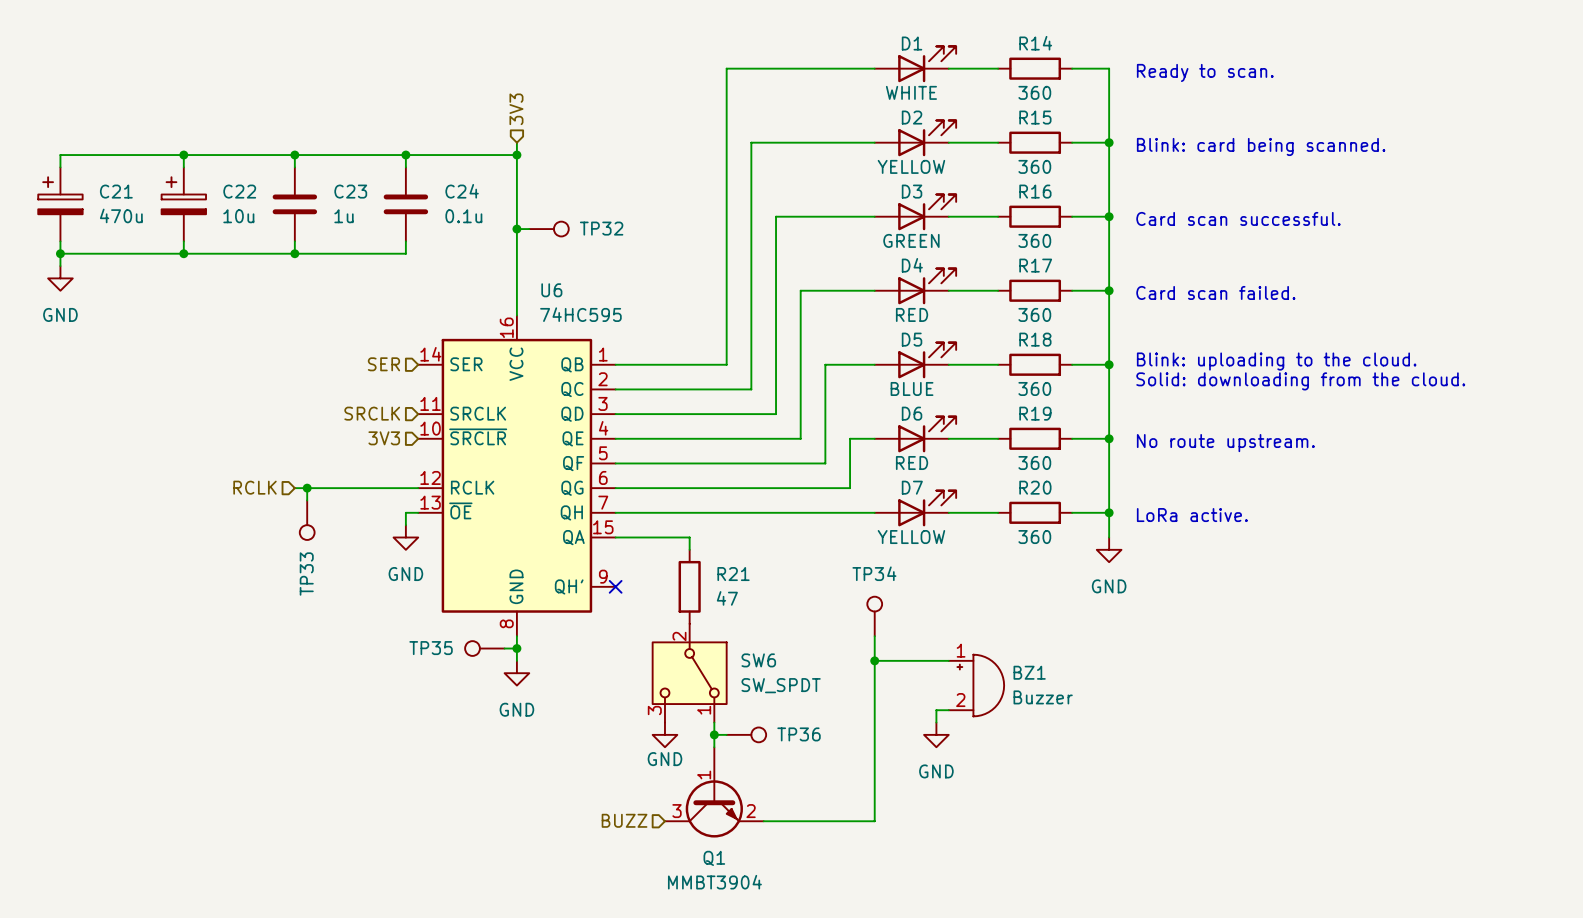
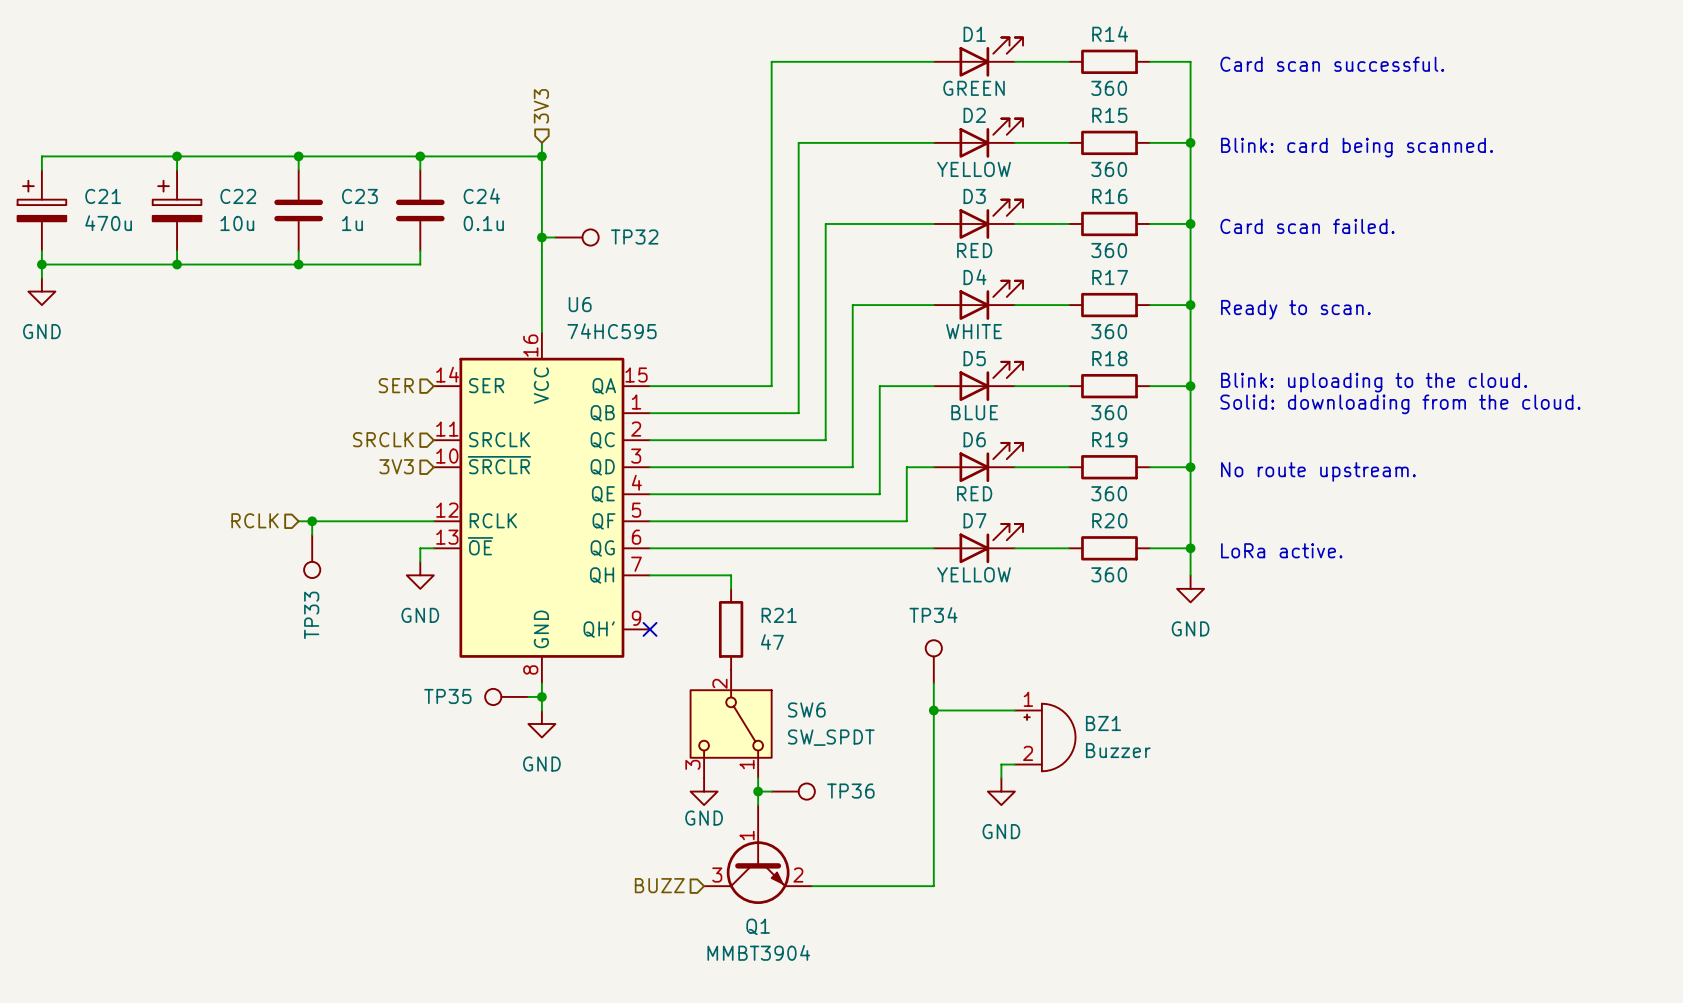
text: Ready to scan. (1205, 72) -> Card scan successful. (1332, 64)
D1 value: WHITE (911, 92) -> GREEN (974, 88)
text: Card scan successful. (1238, 218) -> Card scan failed. (1307, 226)
D3 value: GREEN (911, 240) -> RED (974, 250)
text: Card scan failed. (1215, 292) -> Ready to scan. (1295, 309)
D4 value: RED (912, 314) -> WHITE (974, 331)
U6 symbol: [418, 315, 616, 637] -> [433, 332, 651, 684]

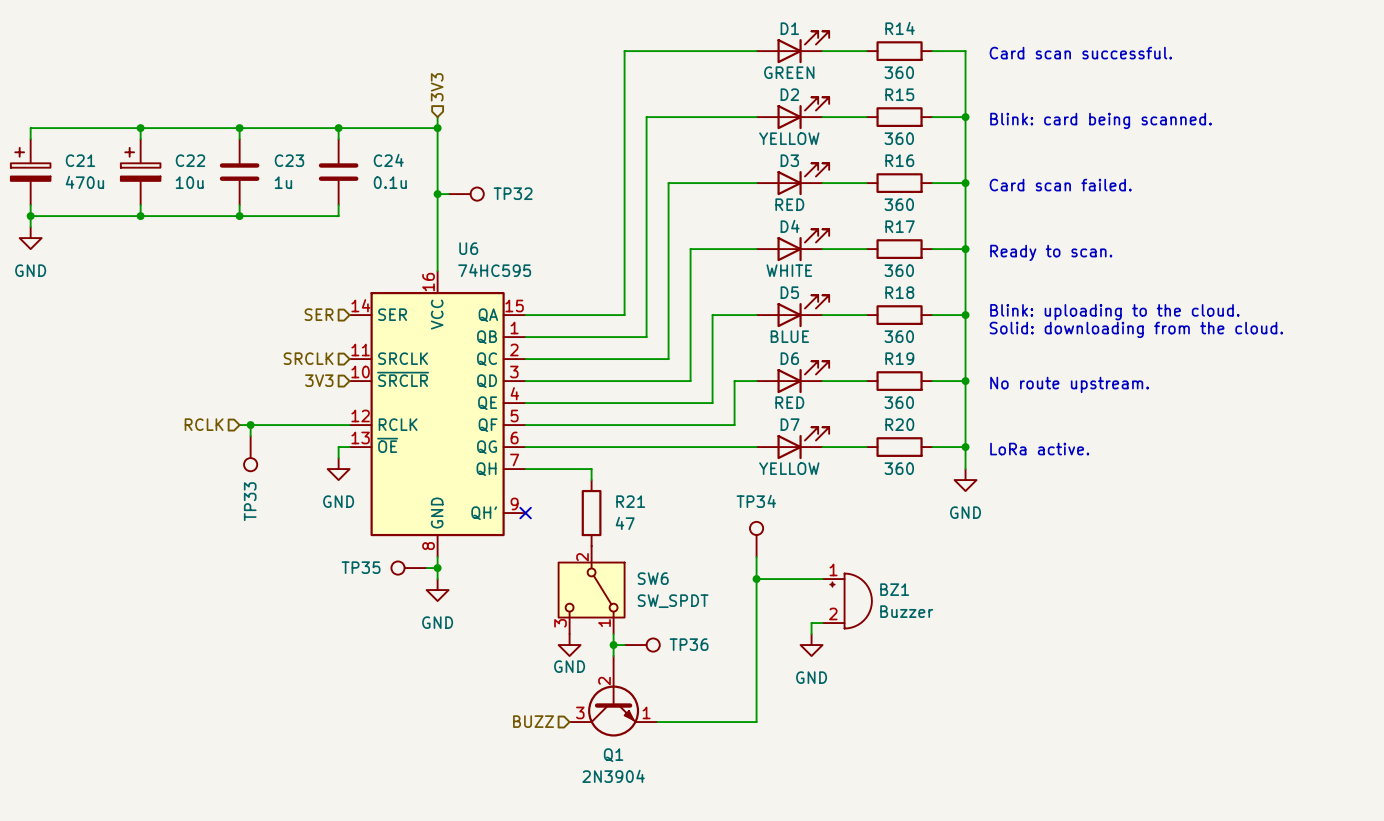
Q1 pin number: 1 (746, 835) -> 2 (604, 681)
Q1 pin number: 2 (798, 875) -> 1 (646, 712)
Q1 value: MMBT3904 (758, 952) -> 2N3904 (613, 776)

